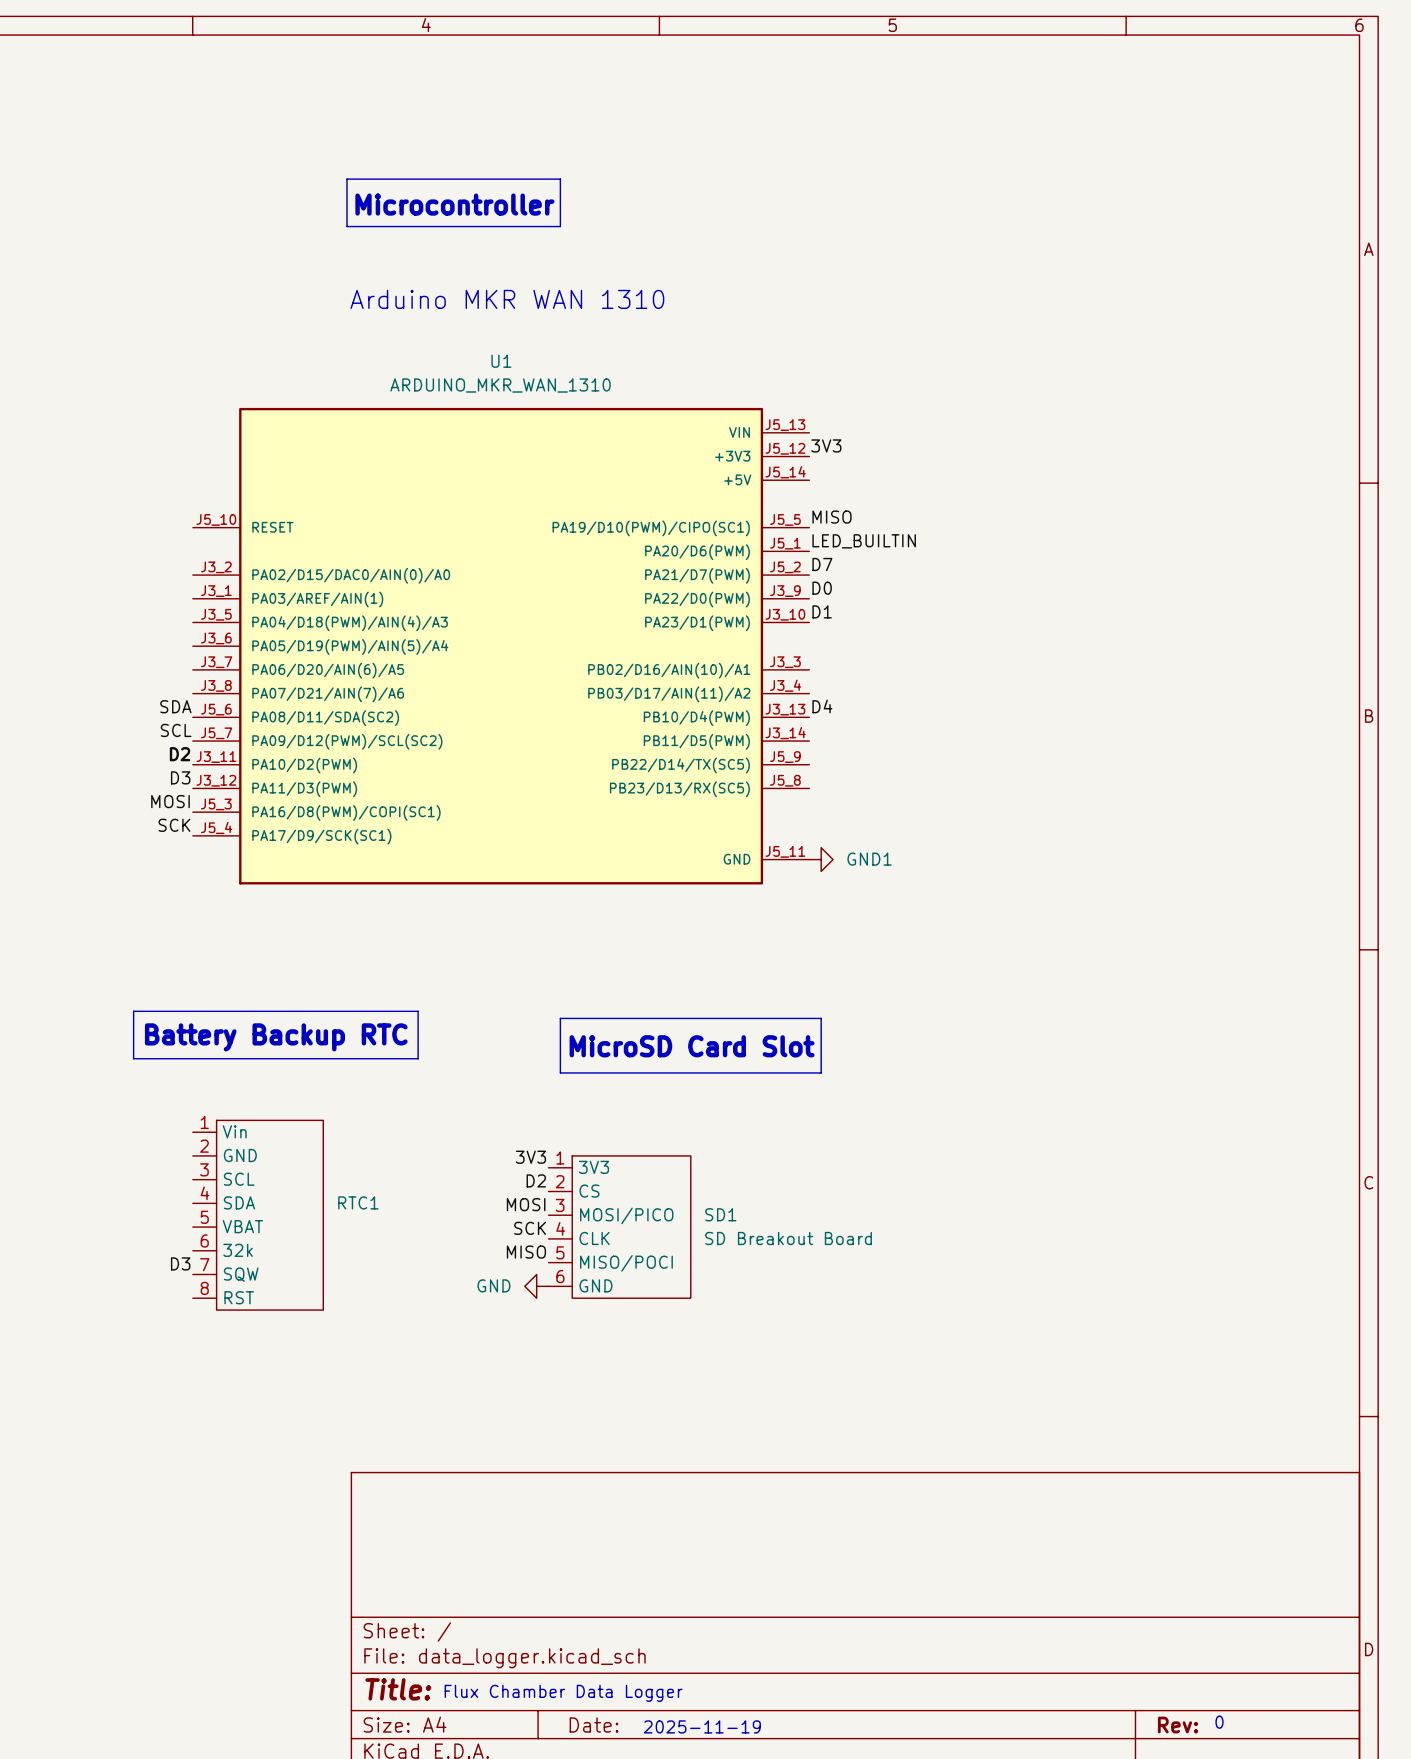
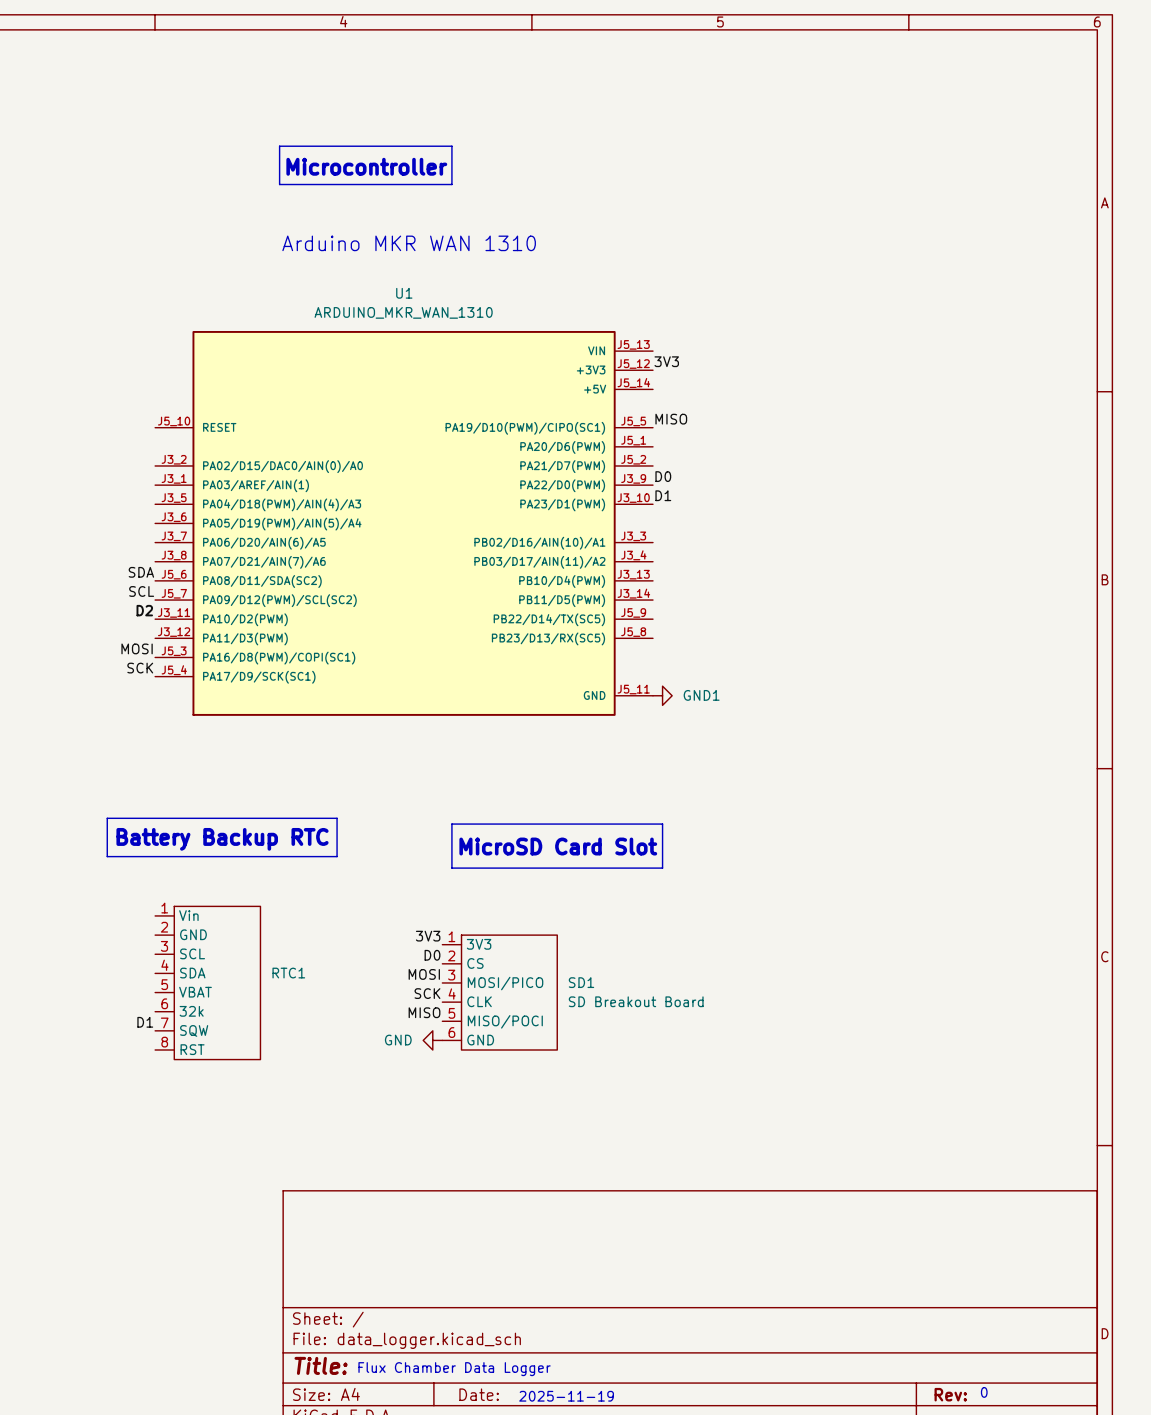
label: LED_BUILTIN (864, 541) -> none
label: D7 (822, 564) -> none
label: D4 (822, 706) -> none
label: D3 (180, 777) -> none
label: D2 (536, 1180) -> D0 (432, 955)
label: D3 (180, 1263) -> D1 (145, 1022)

